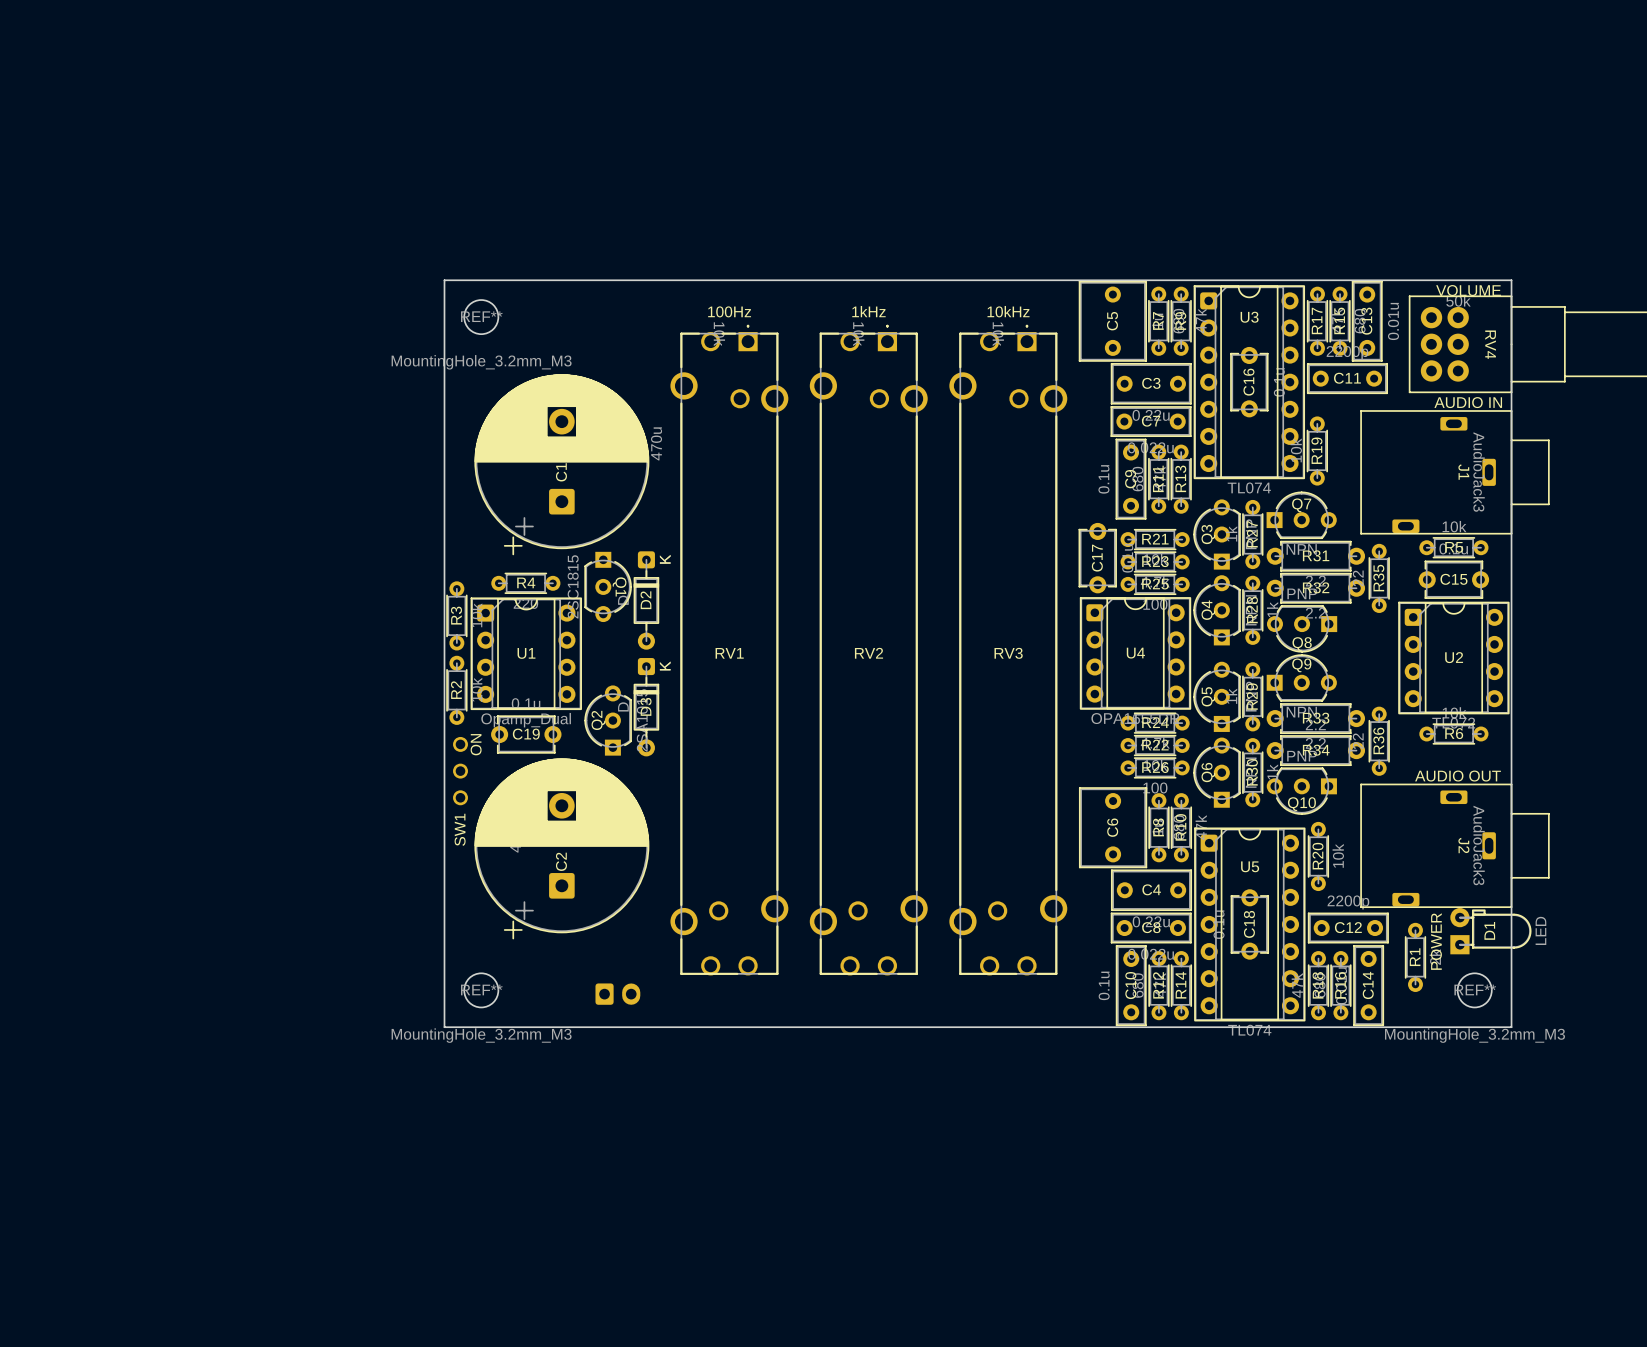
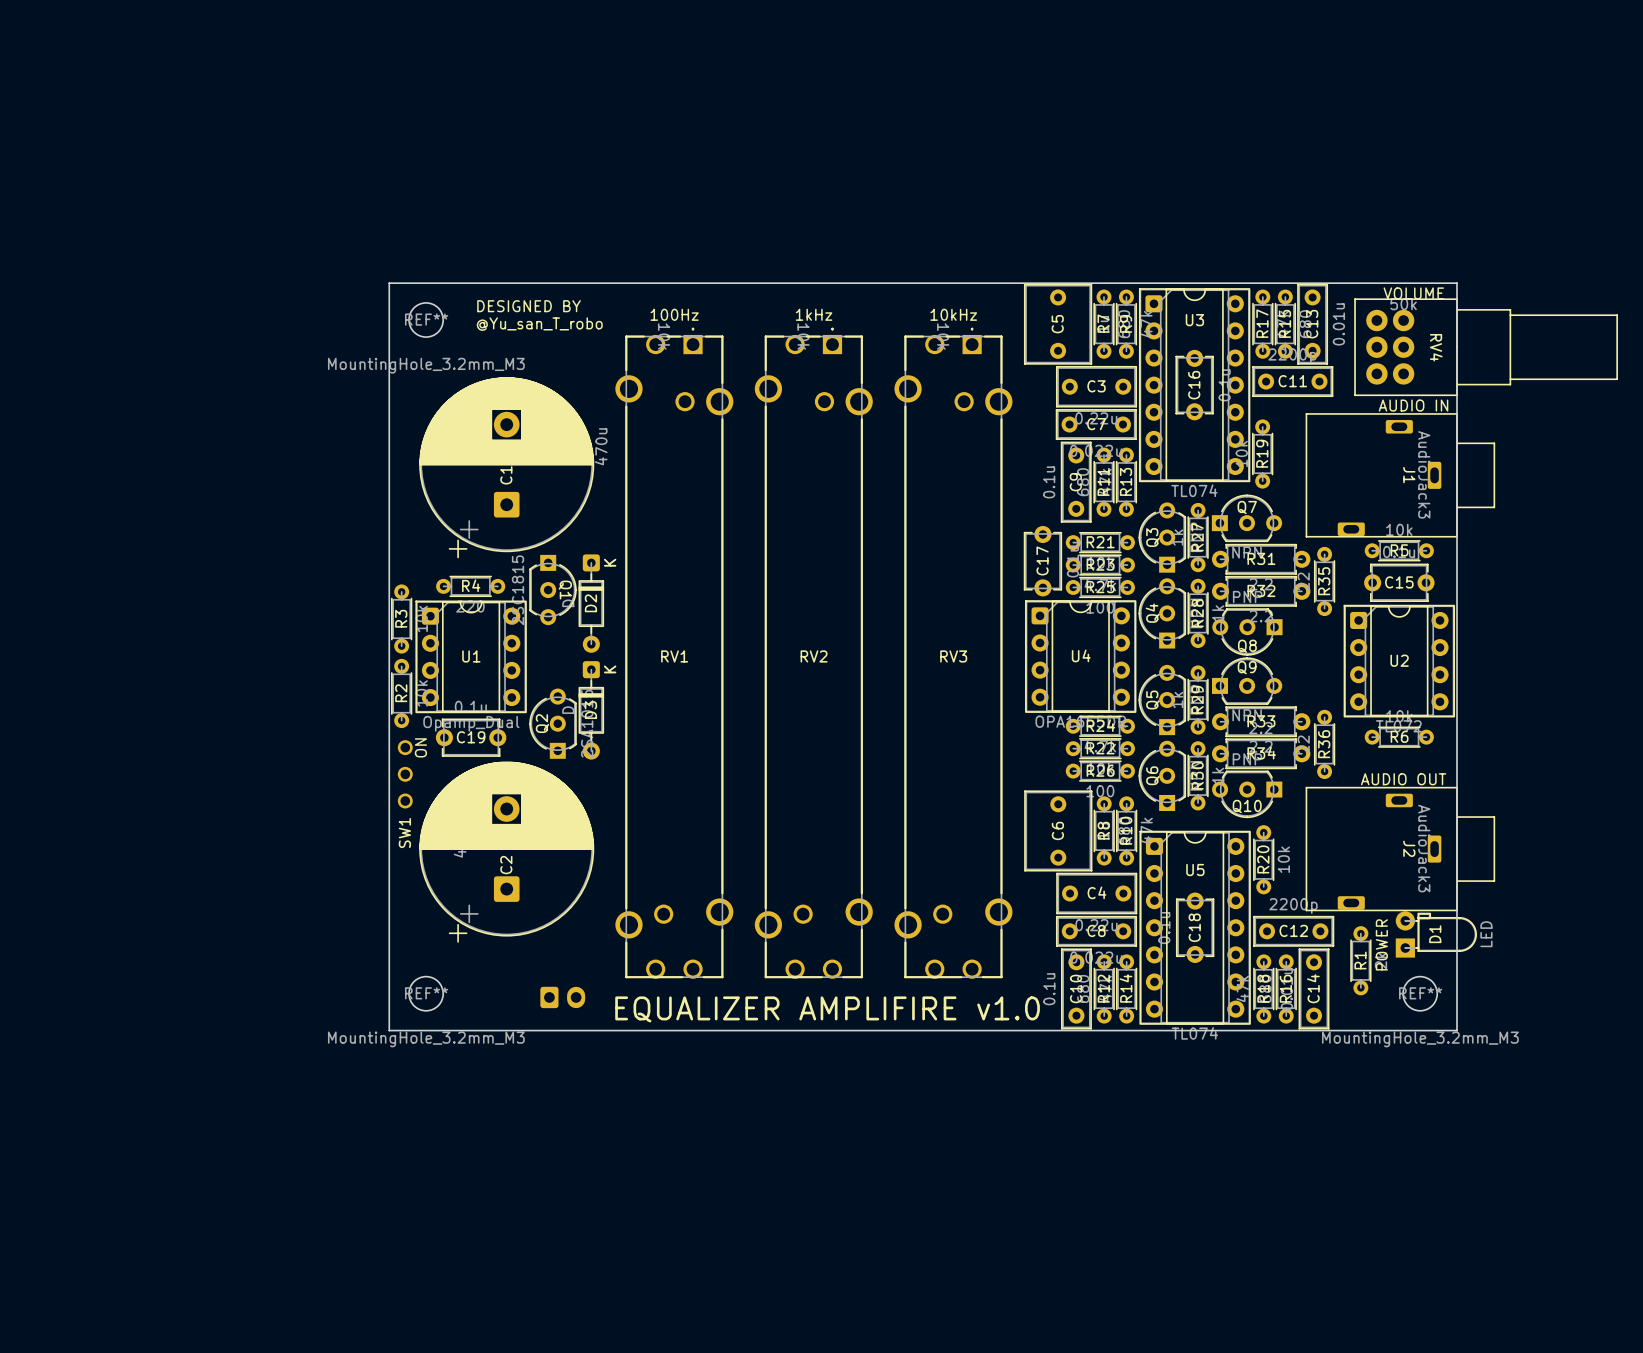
text: none -> DESIGNED BY (529, 306)
text: none -> @Yu_san_T_robo (539, 324)
text: none -> EQUALIZER AMPLIFIRE v1.0 (827, 1009)

